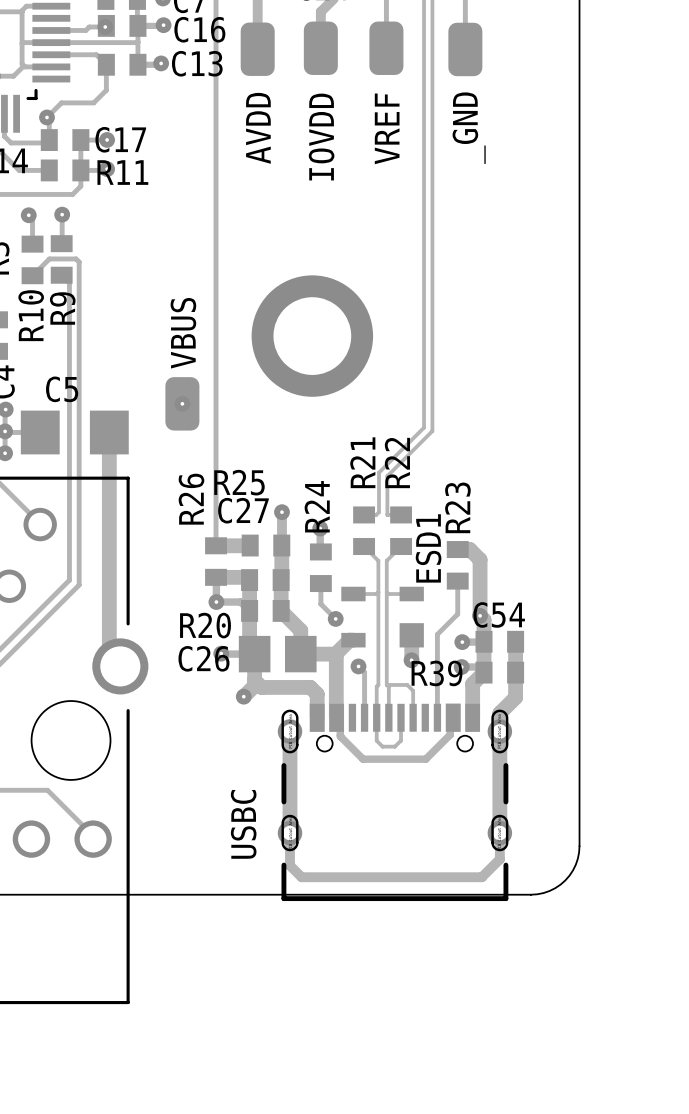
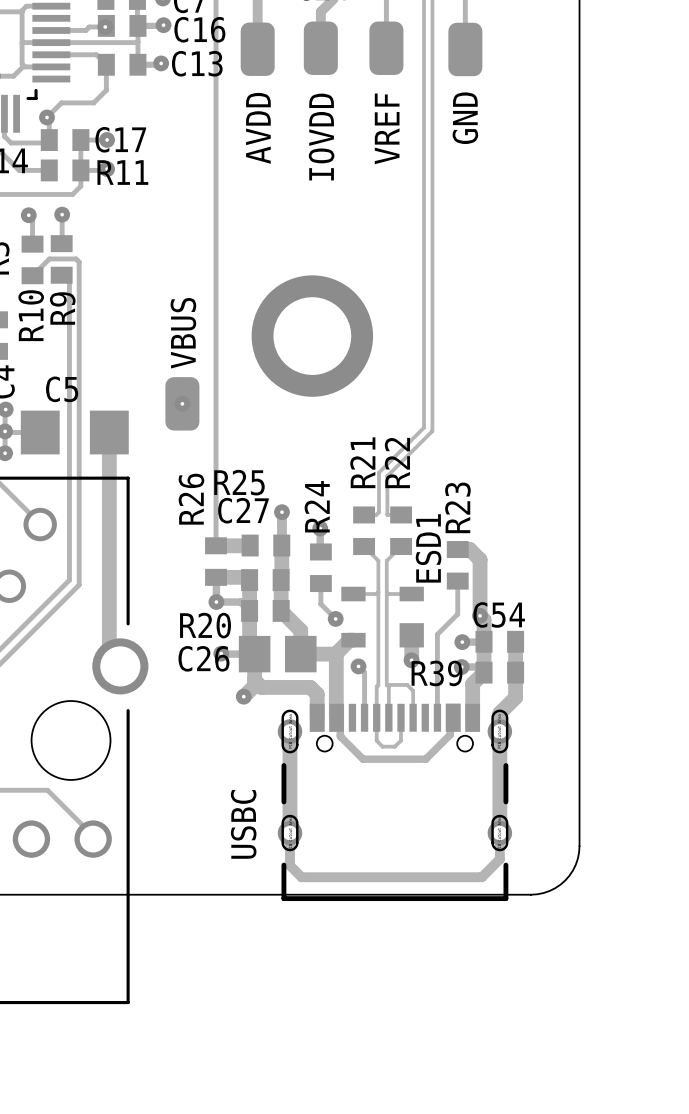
_GND name: _GND (469, 128) -> GND (465, 118)

